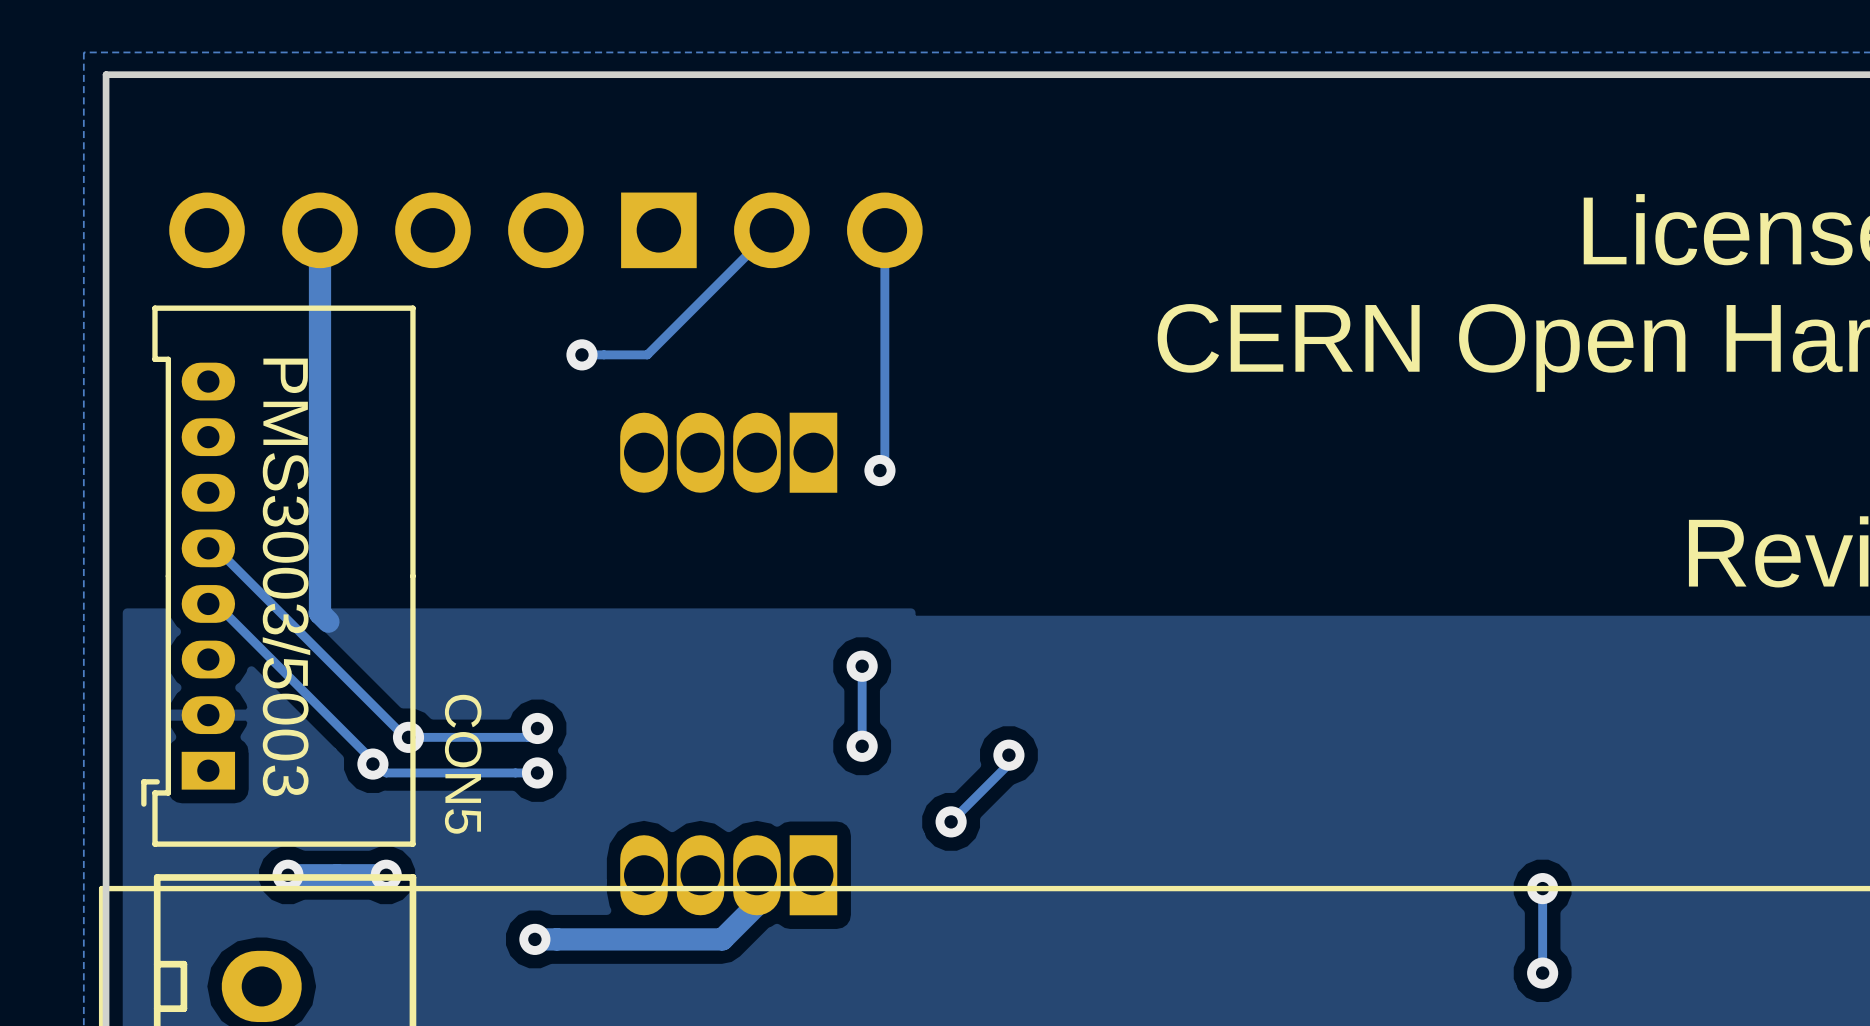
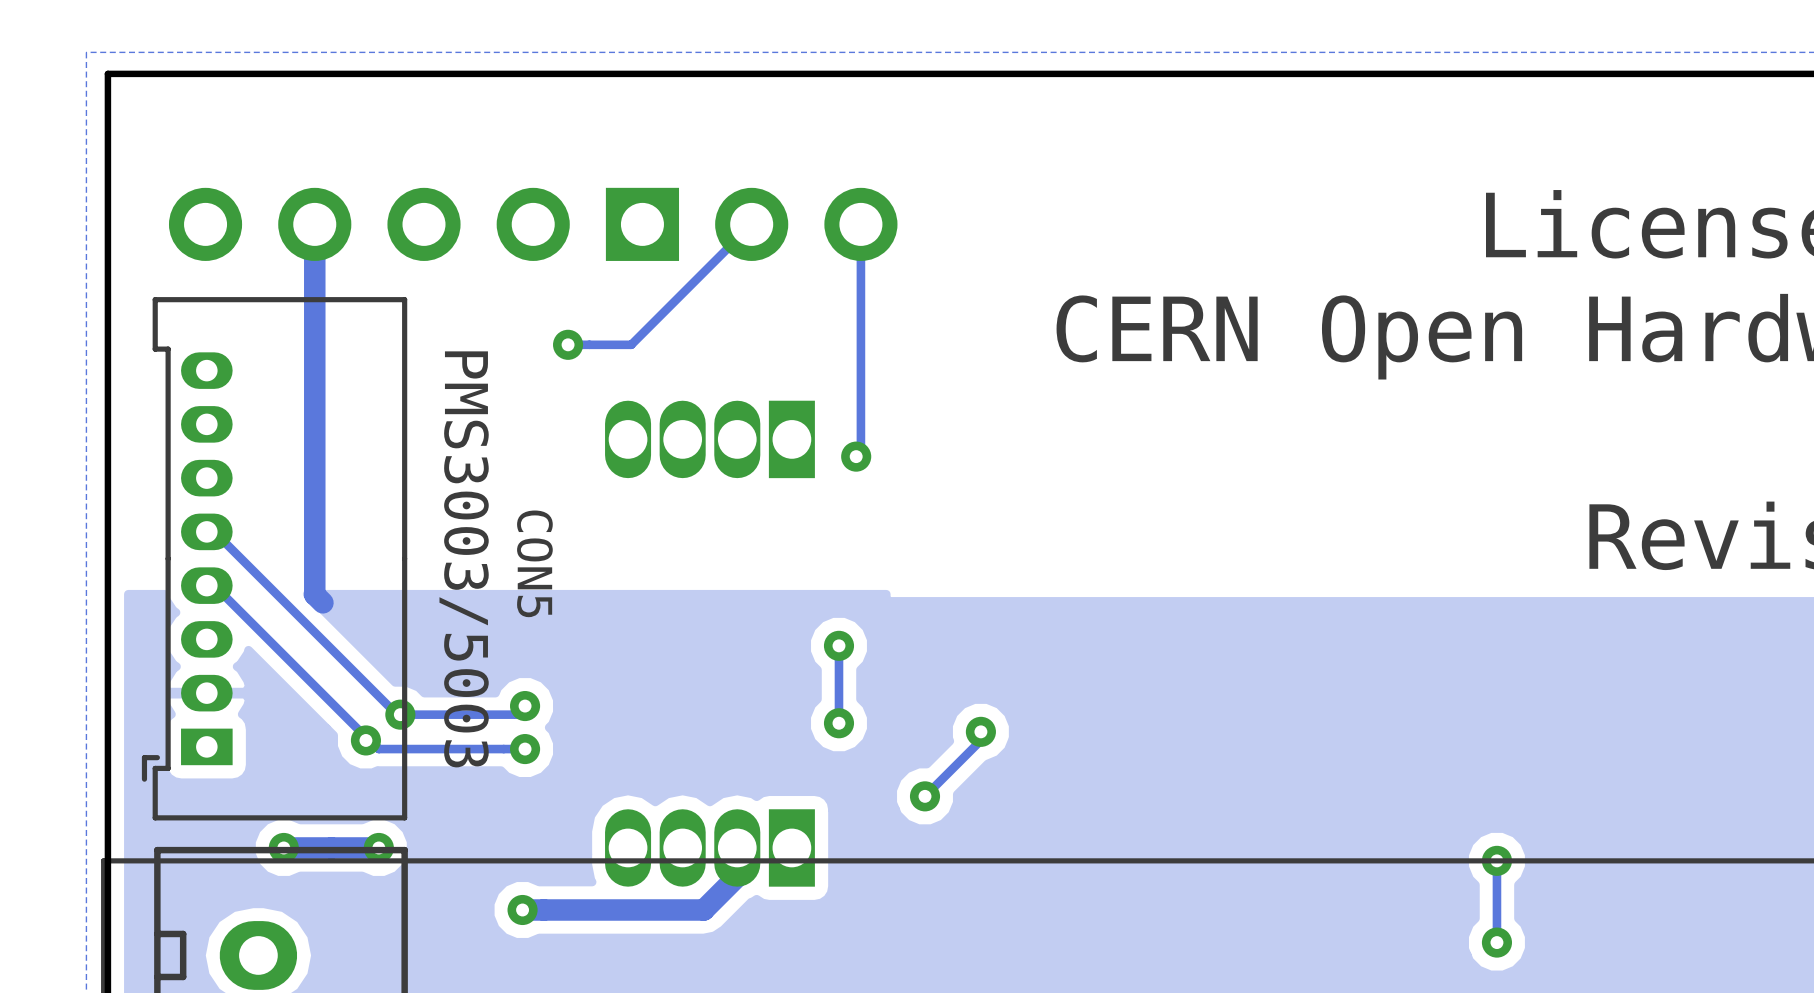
CON5 value position: PMS3003/5003 (286, 577) -> PMS3003/5003 (464, 559)
CON5 name position: CON5 (463, 764) -> CON5 (534, 563)

